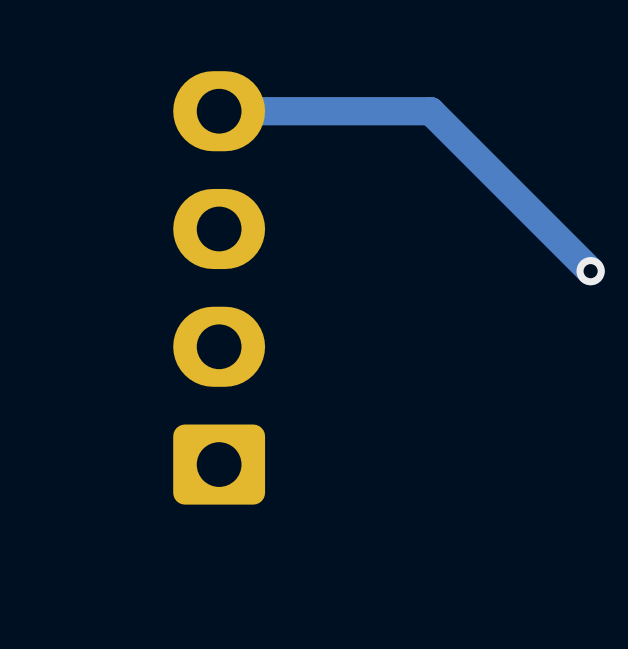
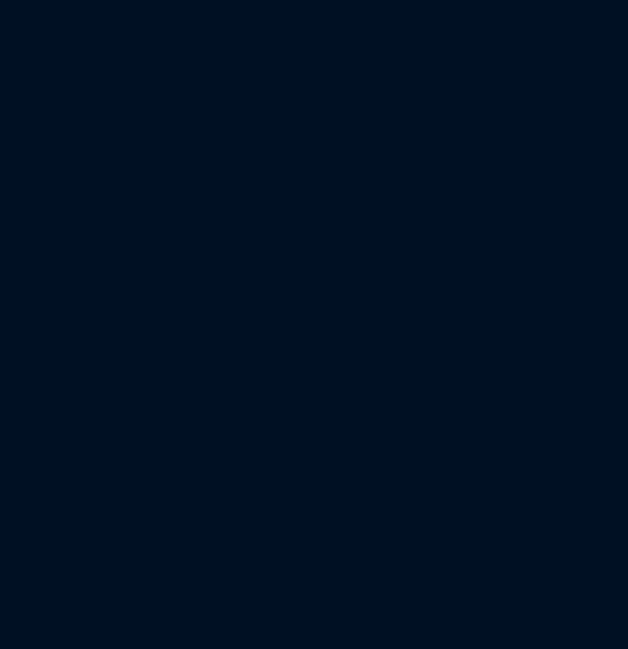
track: (219, 111) (430, 111) (590, 271) -> none
via: (590, 271) -> none
part: (219, 287) -> none

